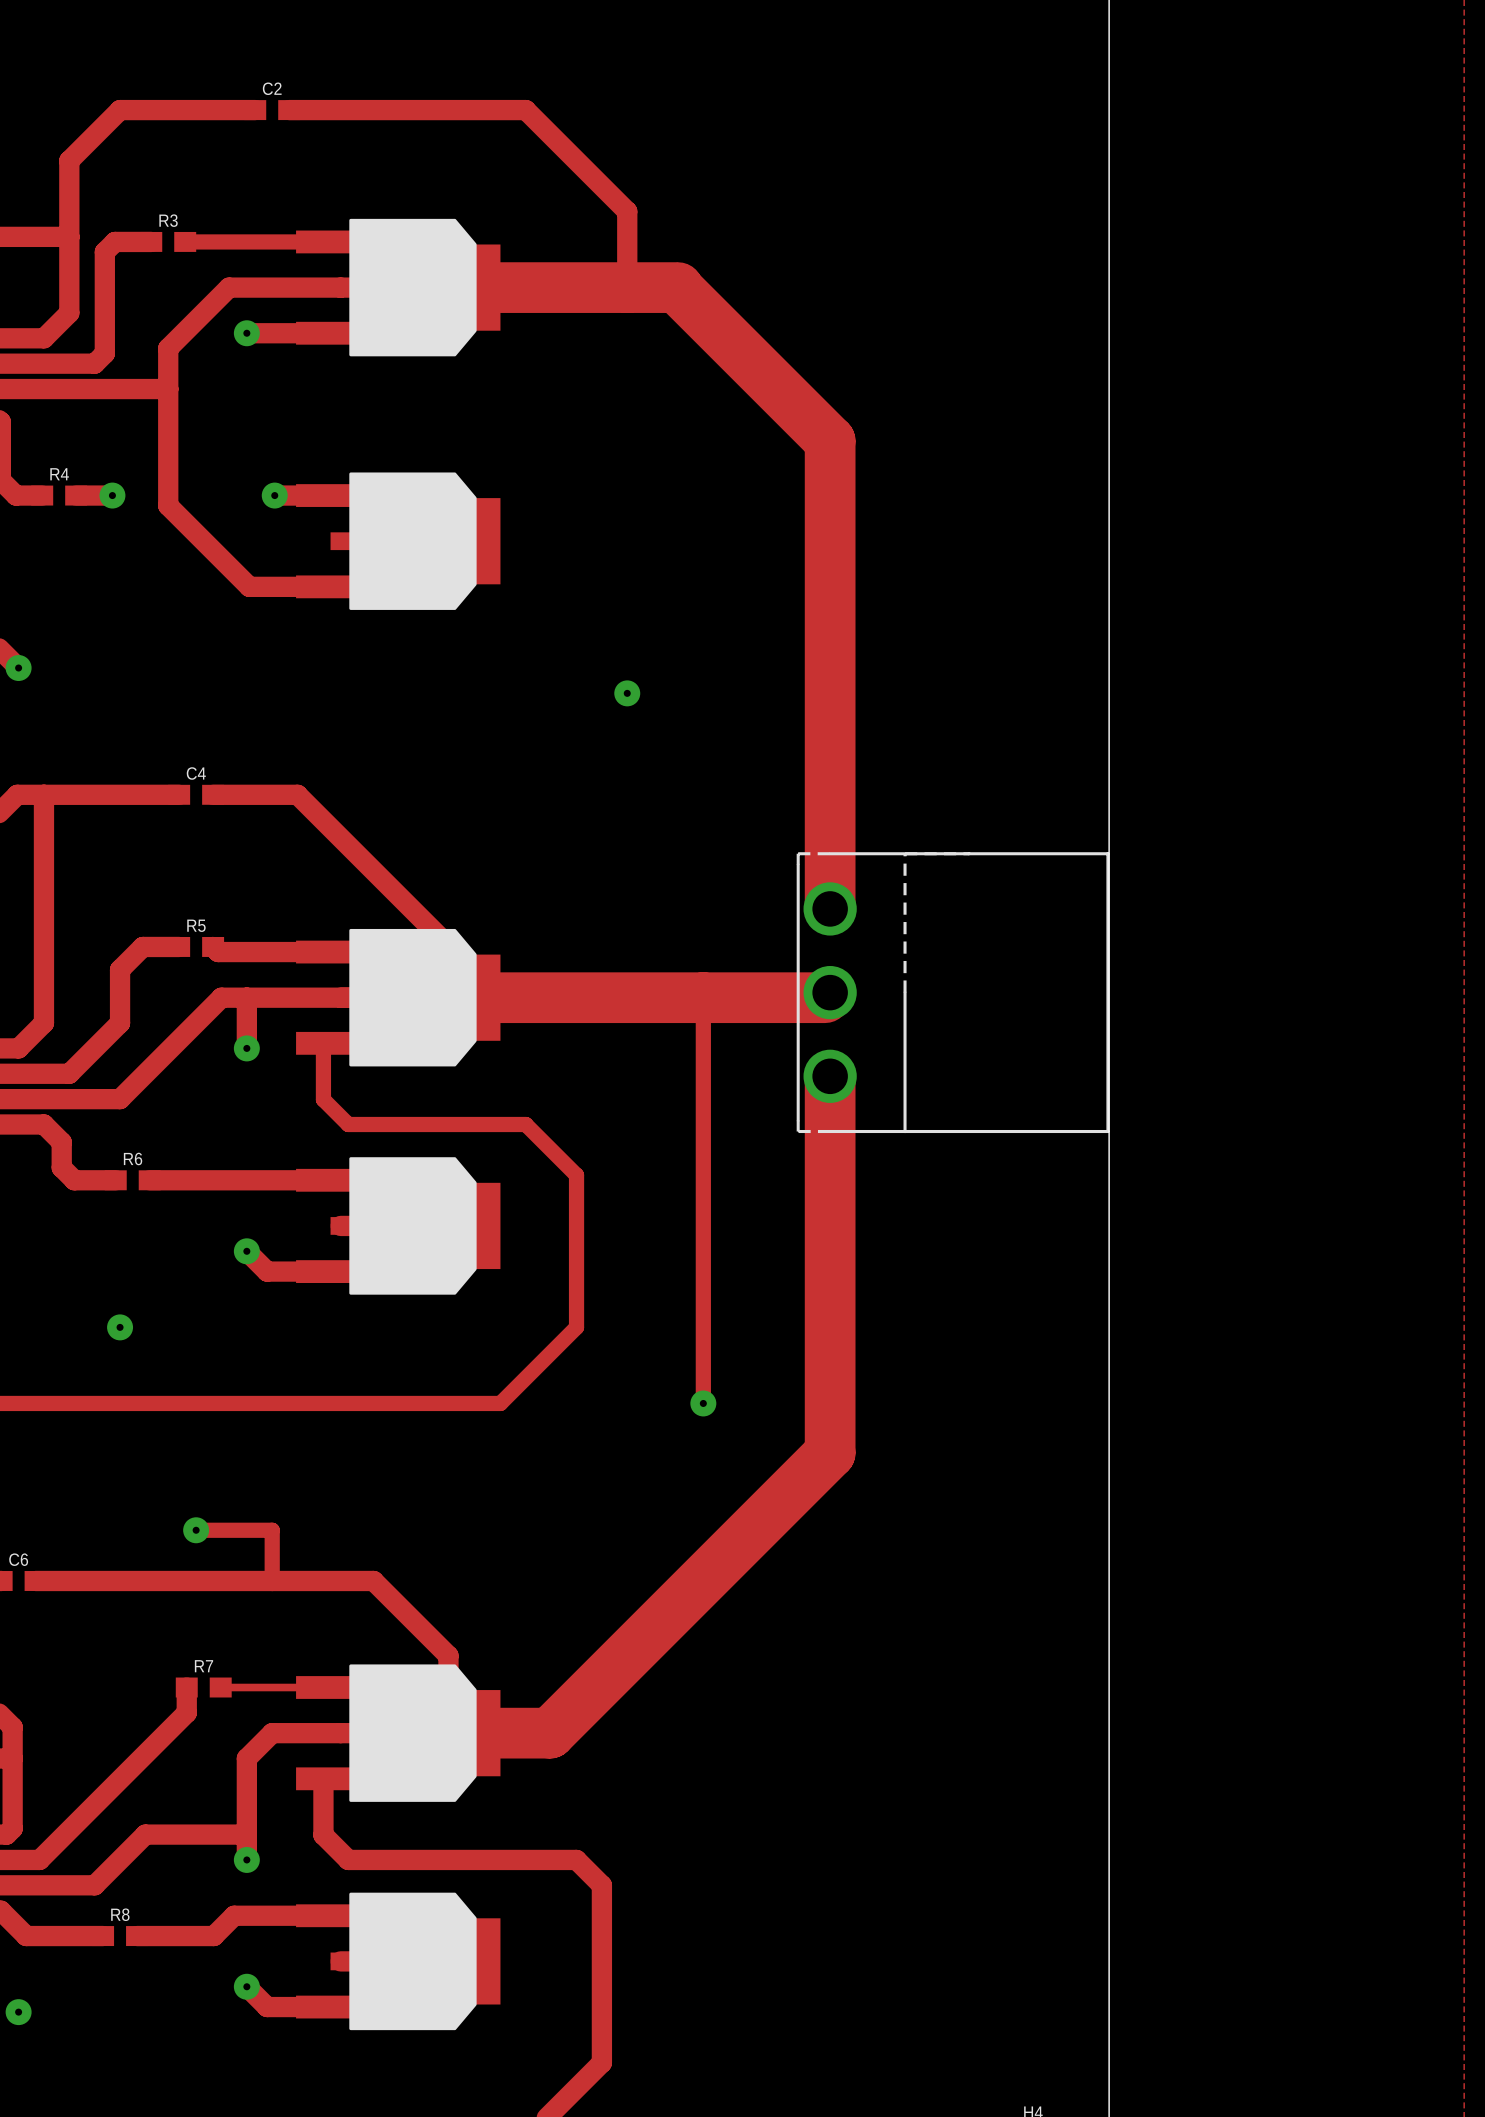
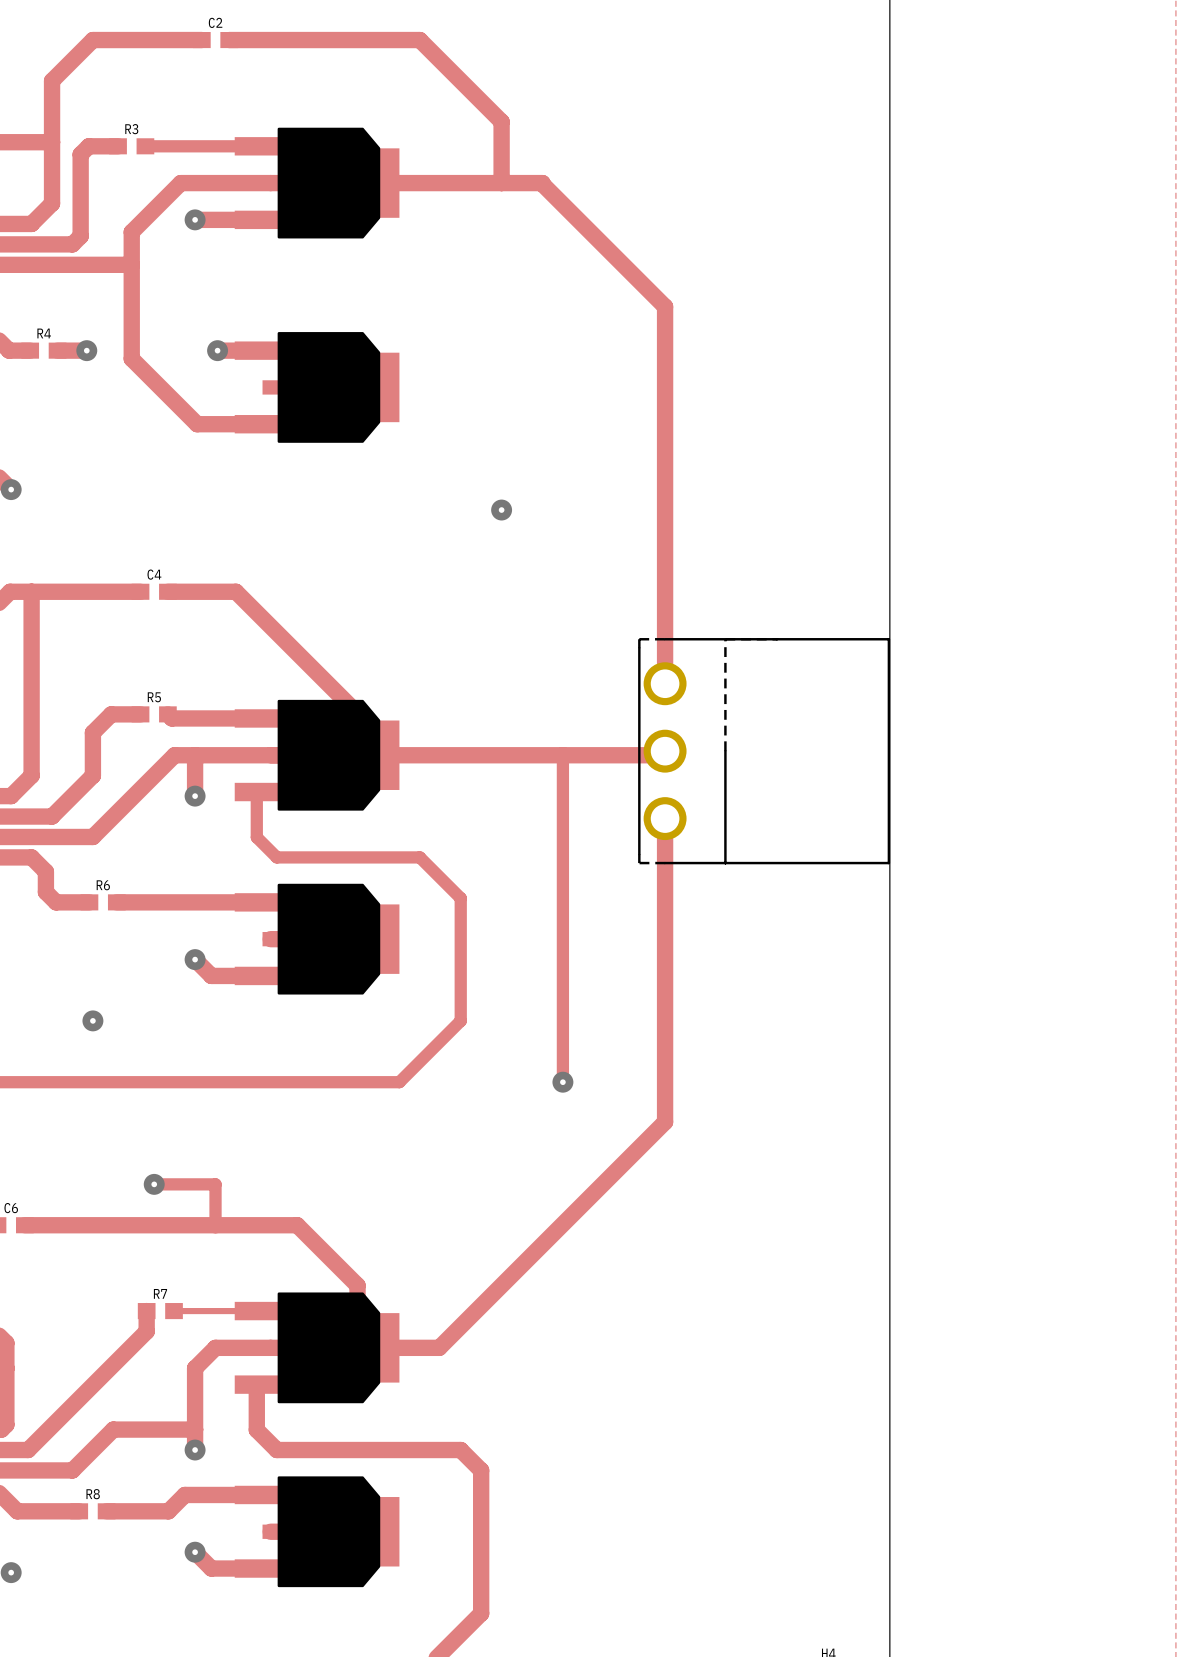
track width: thick (448, 287) (677, 287) -> thin (357, 183) (542, 183)
track width: thick (677, 288) (830, 441) (830, 908) -> thin (541, 183) (665, 306) (665, 683)
track width: thick (448, 997) (825, 997) -> thin (357, 755) (660, 755)
track width: thick (830, 1076) (830, 1452) (549, 1733) (448, 1733) -> thin (665, 818) (665, 1122) (439, 1347) (357, 1347)

